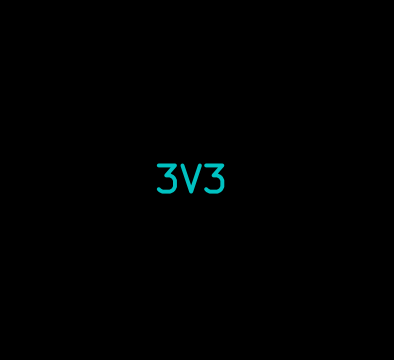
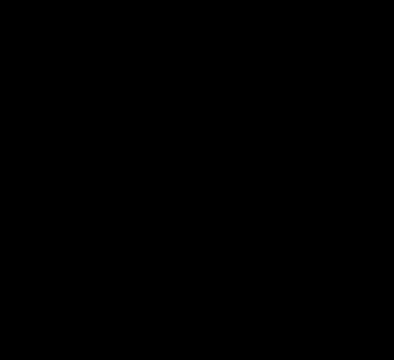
text: 3V3 (190, 178) -> none

